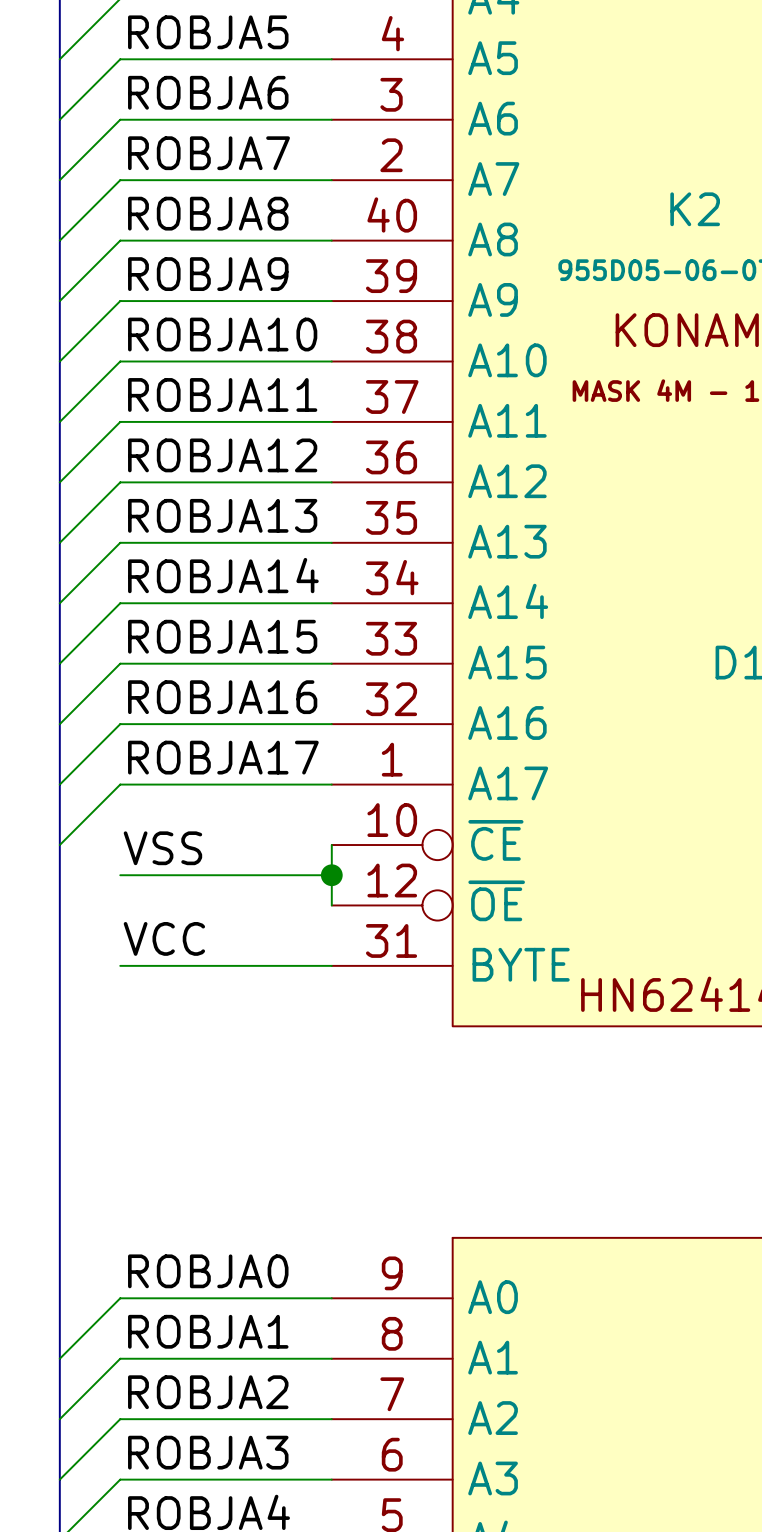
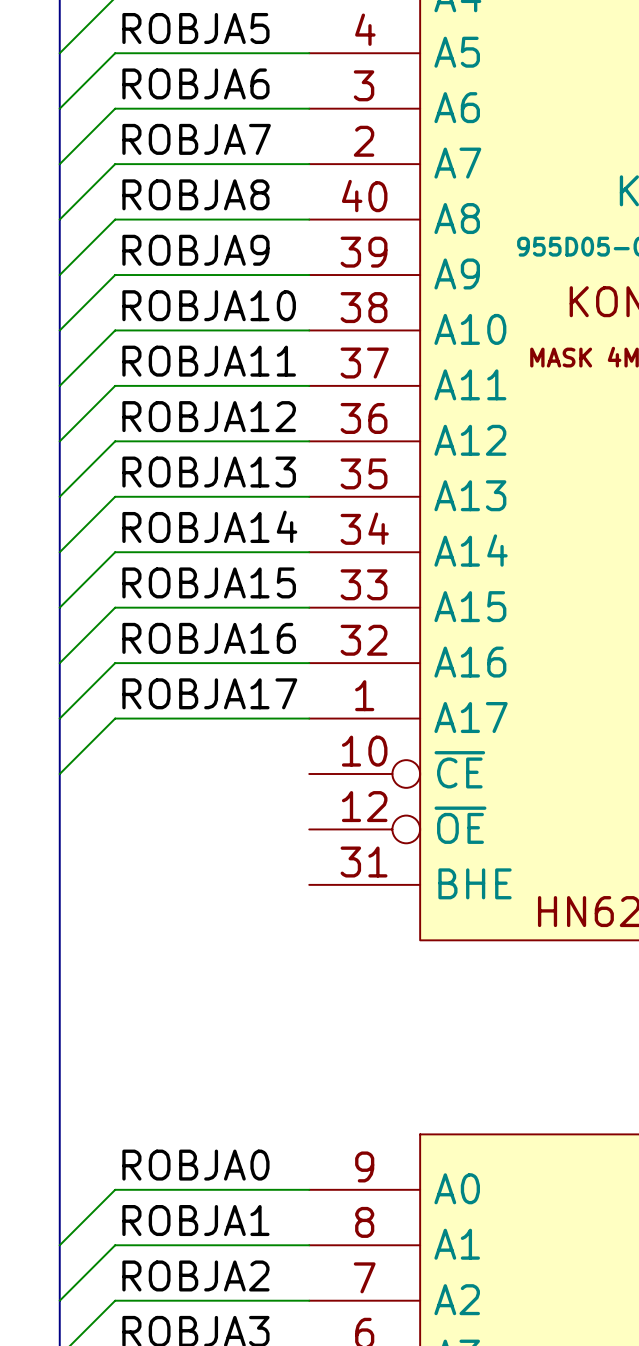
wire: (331, 845) (331, 905) -> none
label: VSS (162, 848) -> none
wire: (120, 875) (331, 875) -> none
junction: (331, 875) -> none
label: VCC (164, 938) -> none
K2 pin name: BYTE (521, 964) -> BHE (475, 883)
wire: (120, 965) (331, 965) -> none

